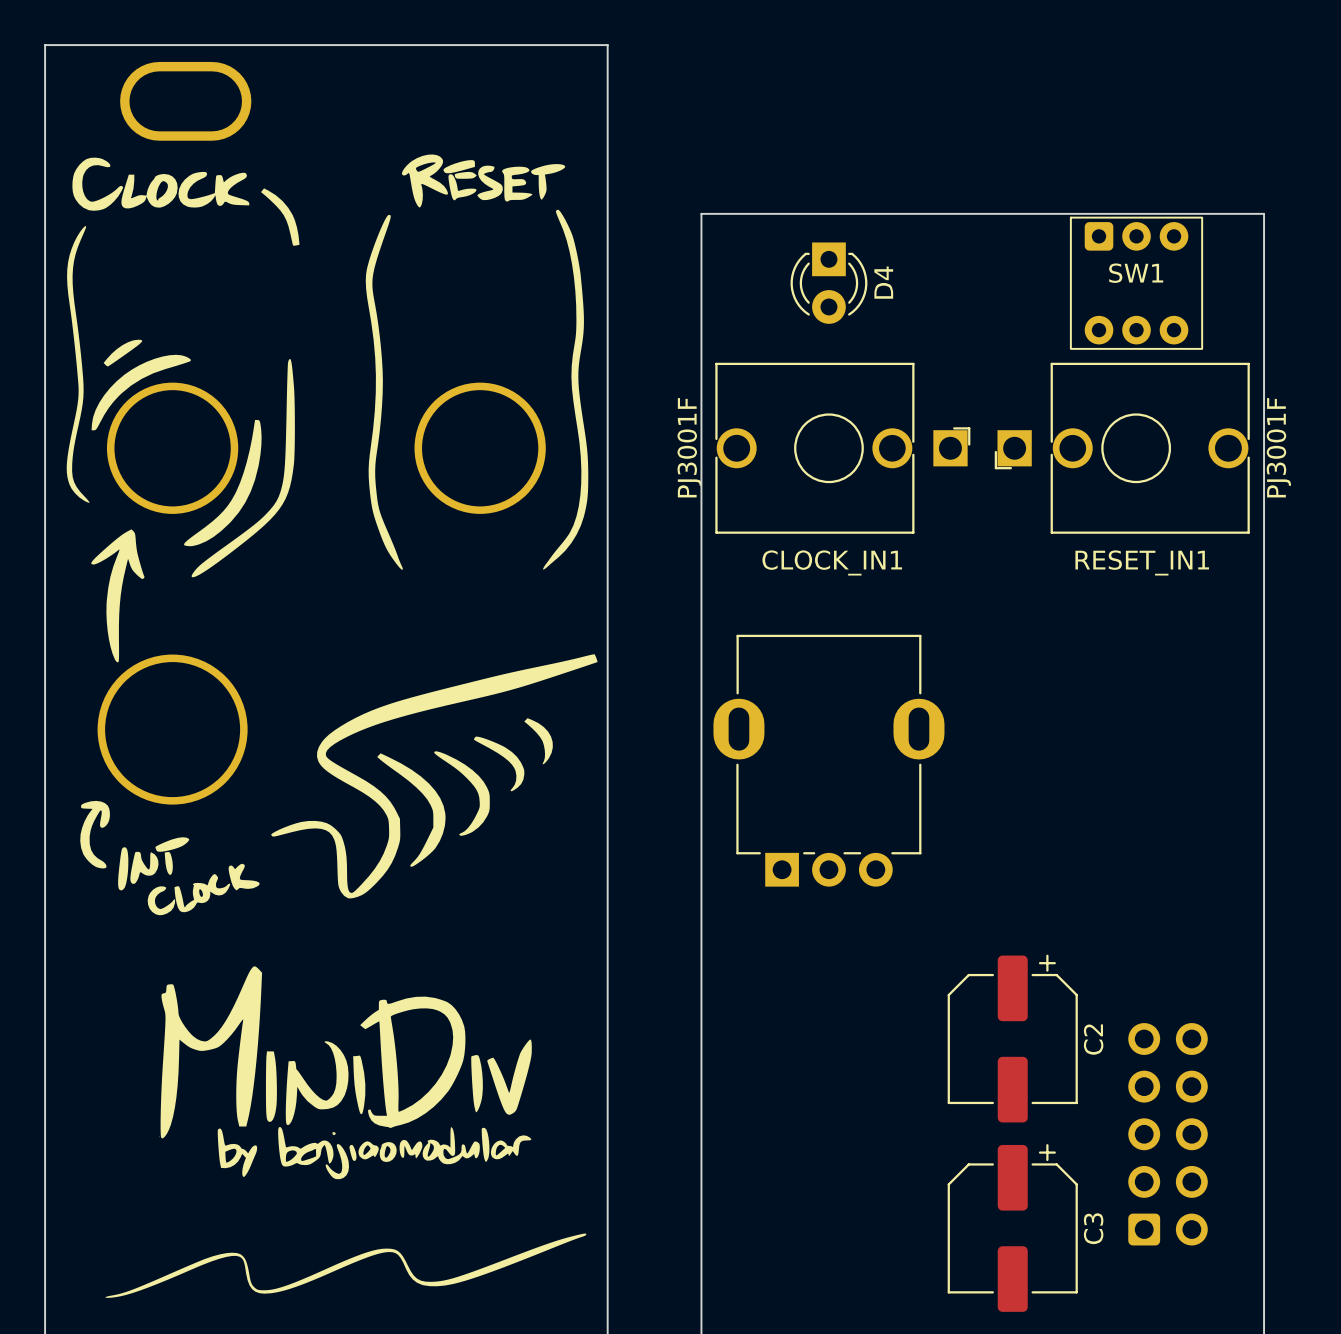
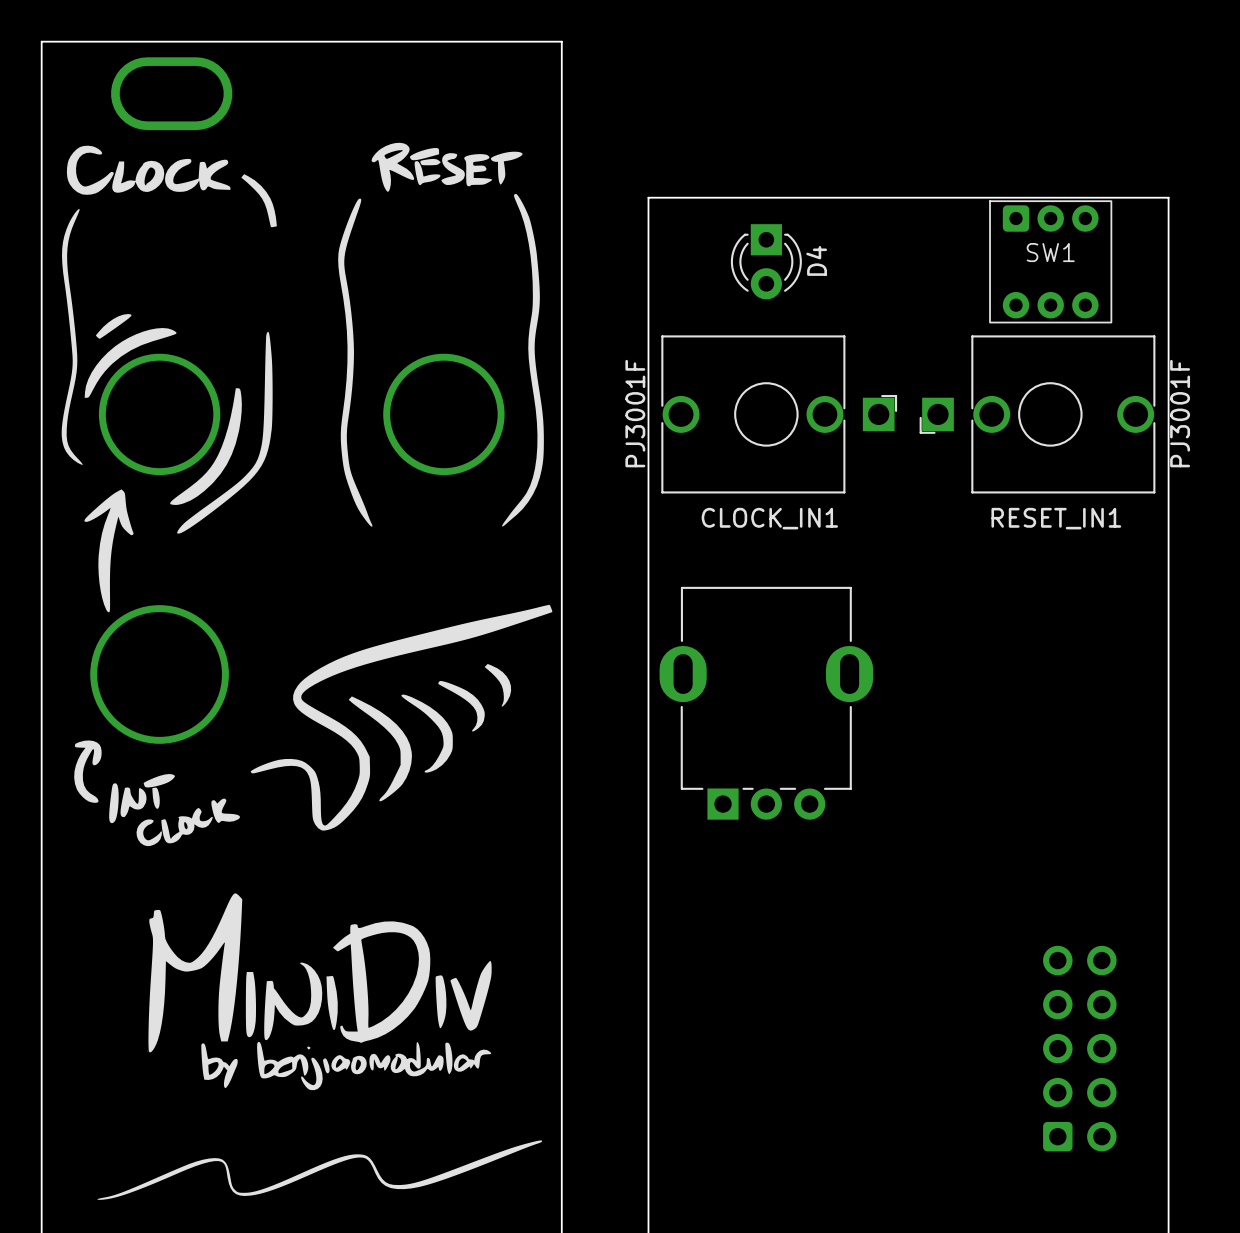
C2: (1012, 1038) -> none
C3: (1012, 1227) -> none

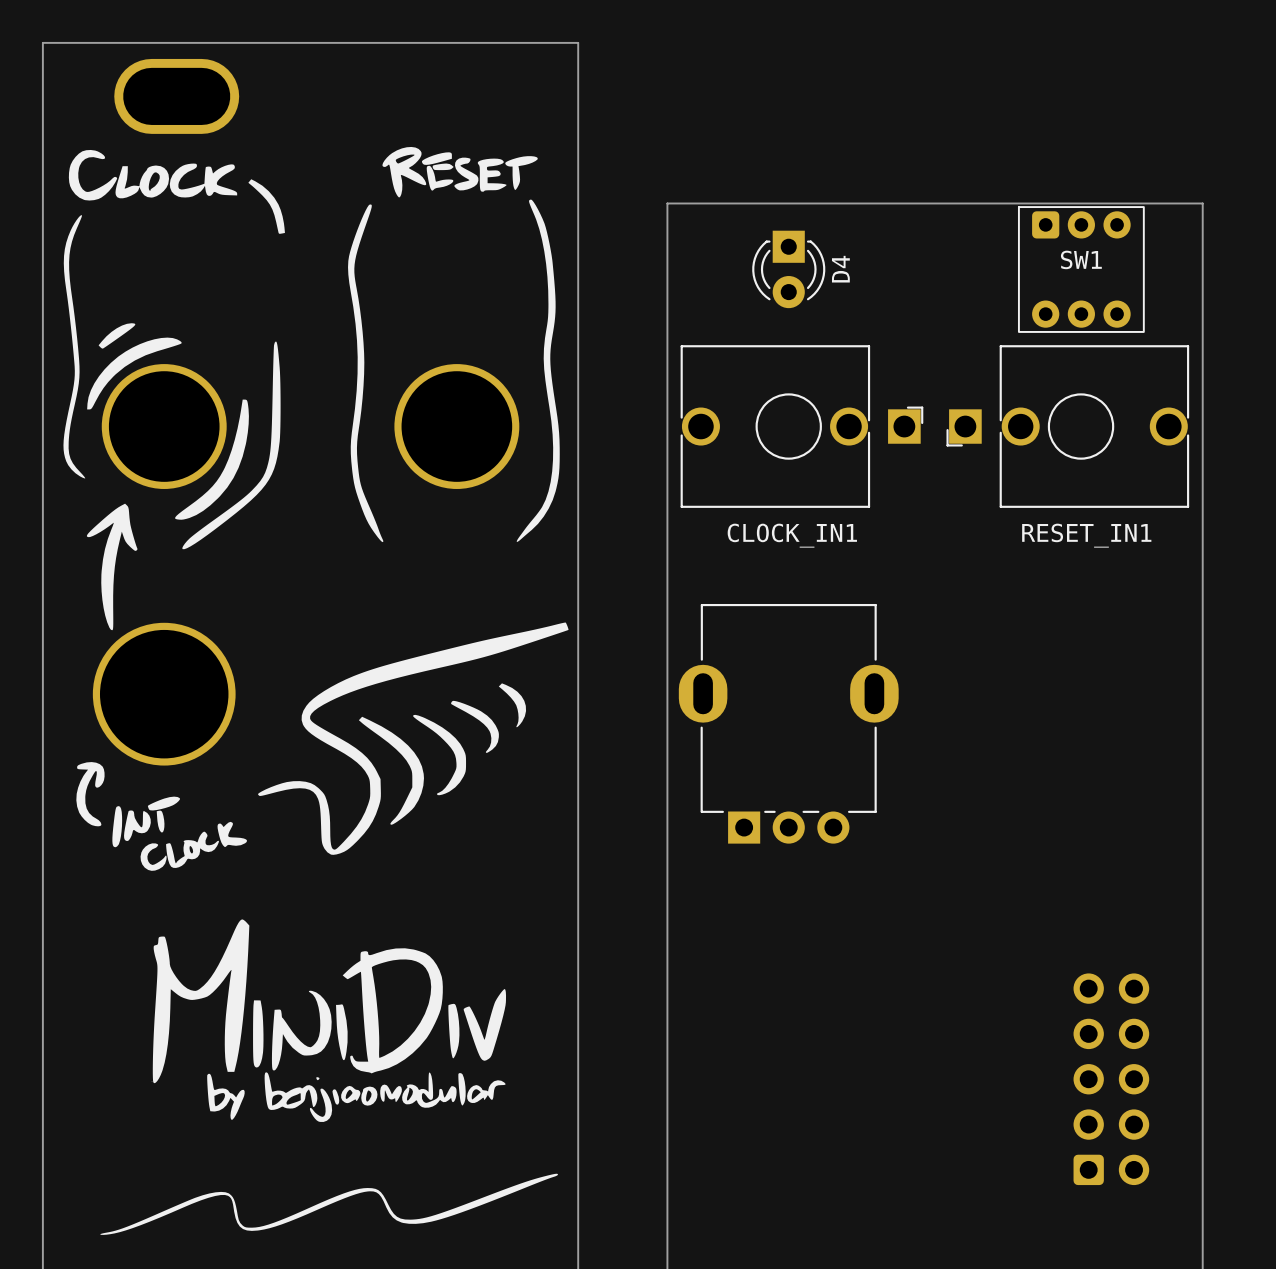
CLOCK_IN1 value: PJ3001F (635, 413) -> none
RESET_IN1 value: PJ3001F (1180, 413) -> none

